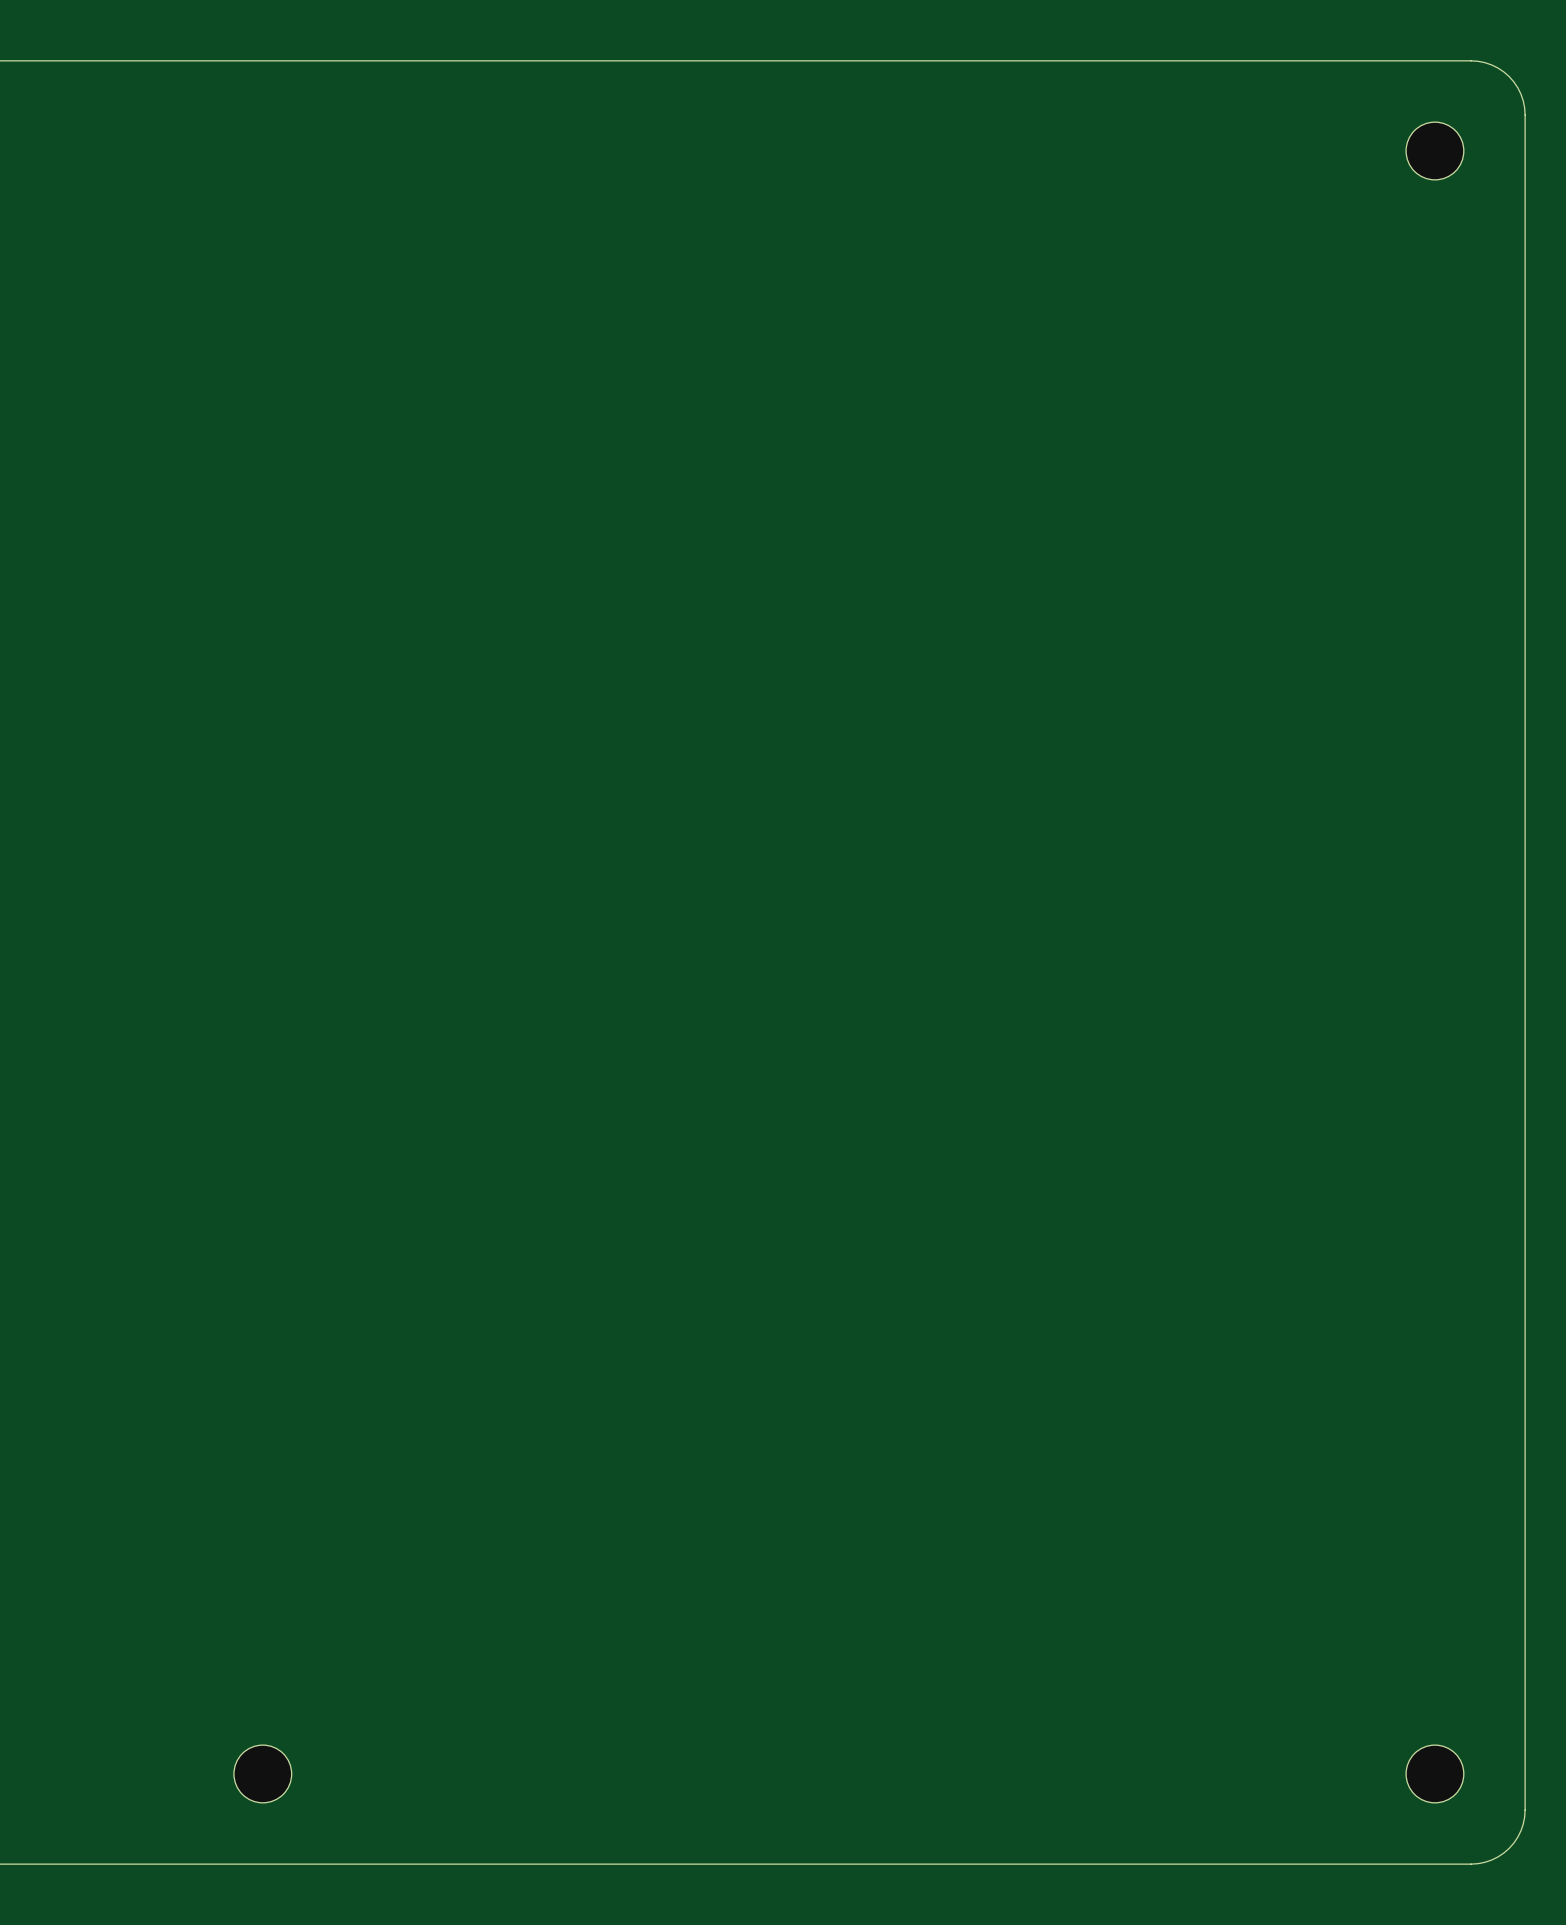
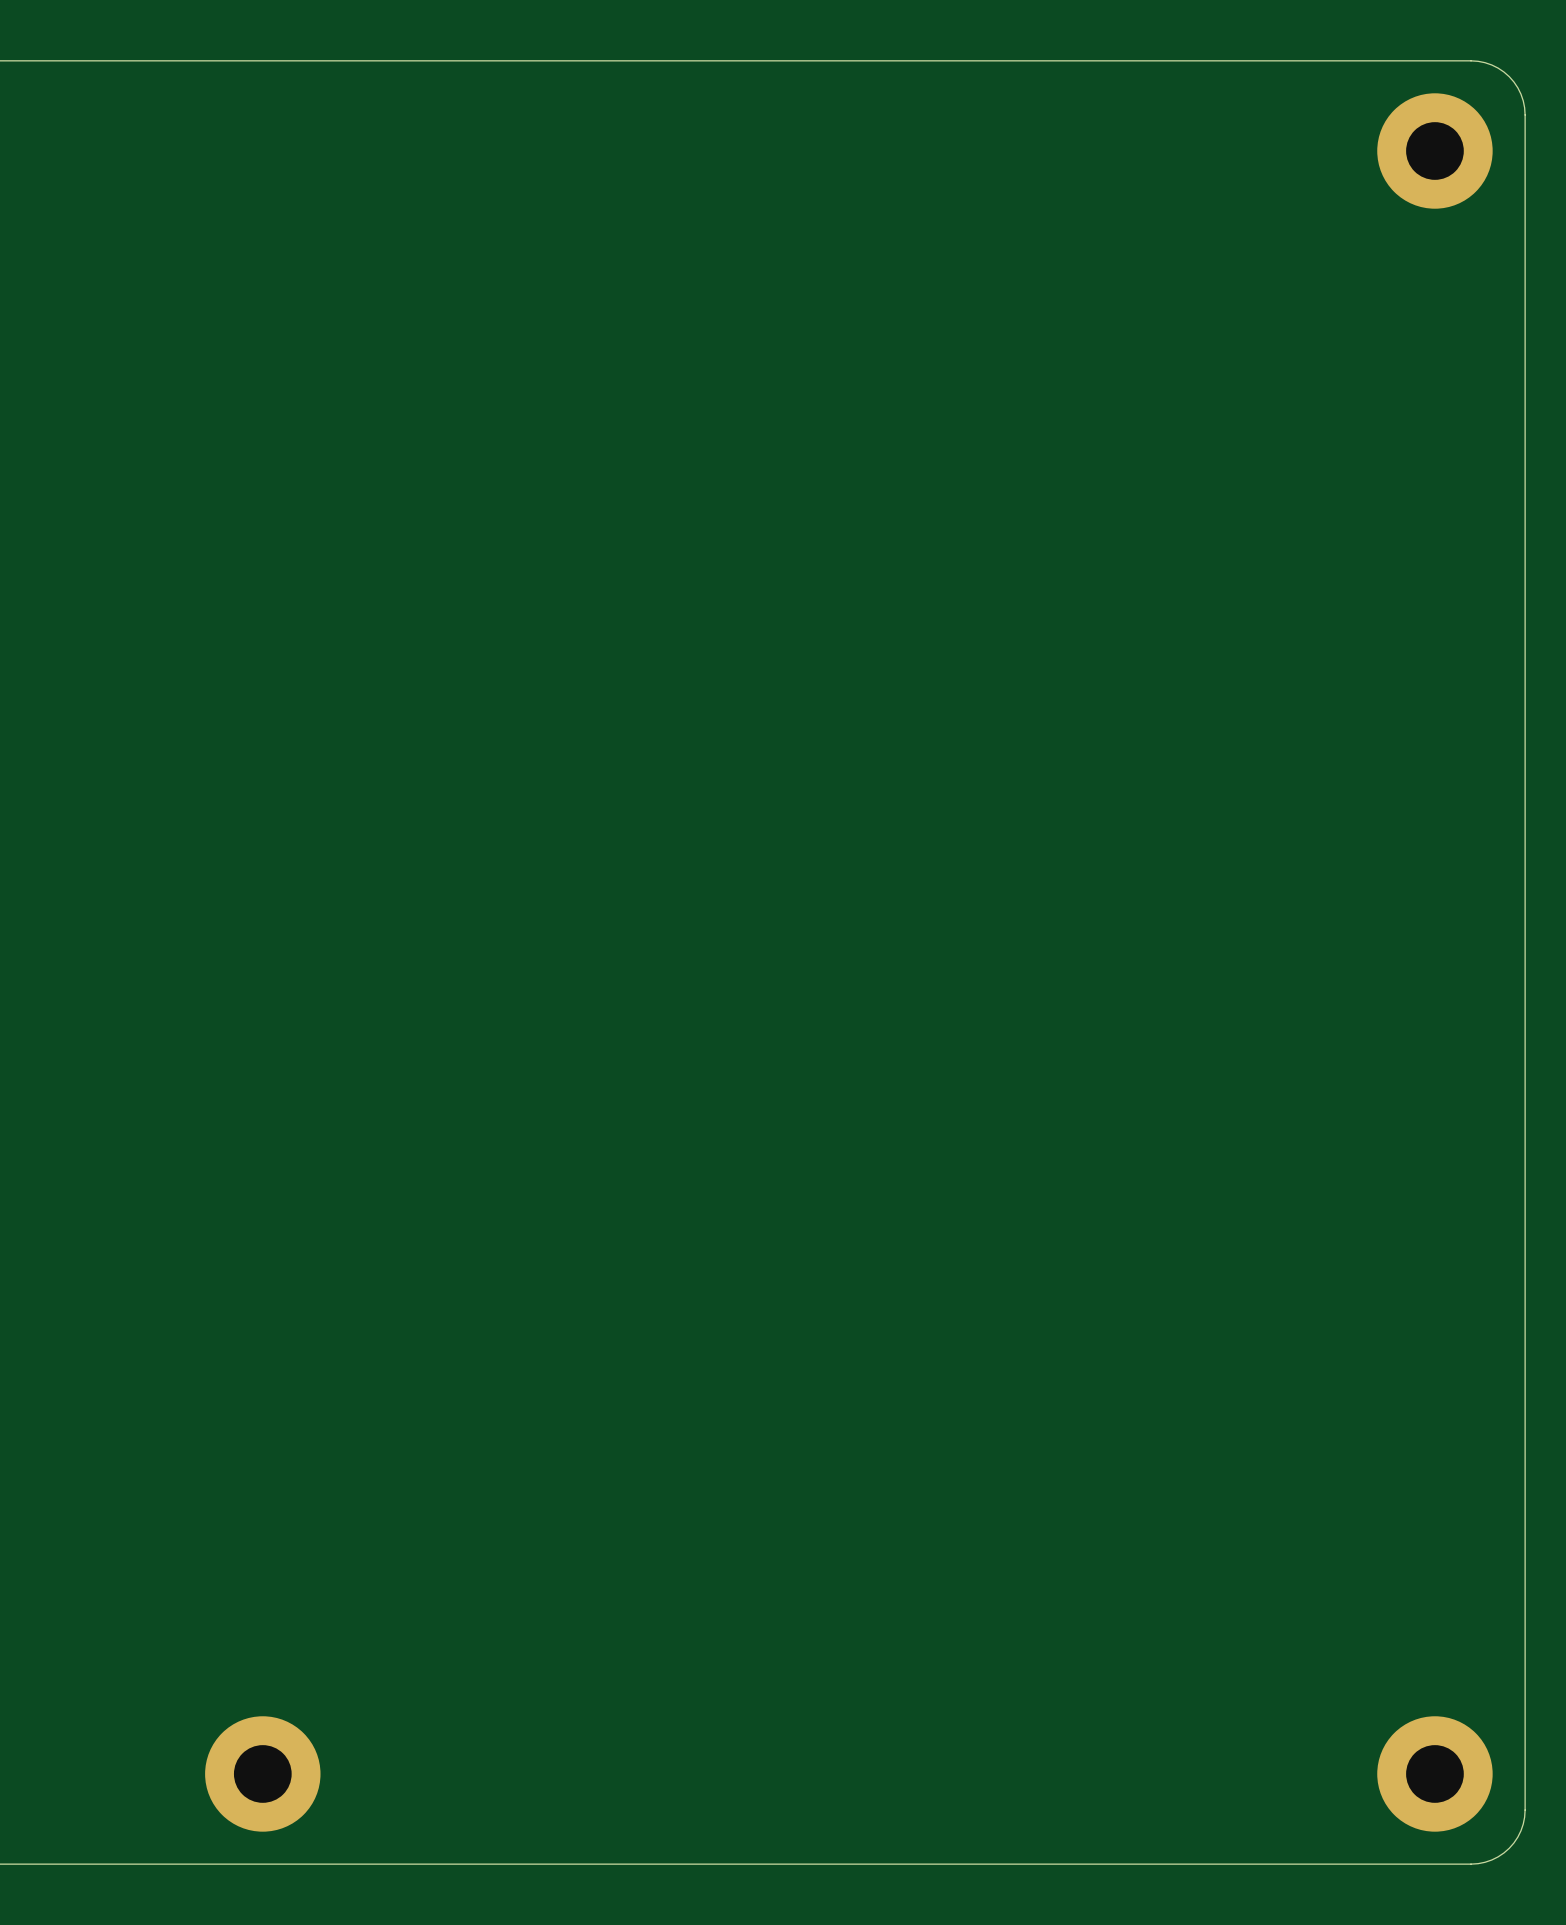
part footprint: [1406, 122, 1464, 180] -> [1377, 93, 1493, 209]
part footprint: [233, 1745, 292, 1803] -> [205, 1716, 321, 1832]
part footprint: [1406, 1745, 1464, 1803] -> [1377, 1716, 1493, 1832]

